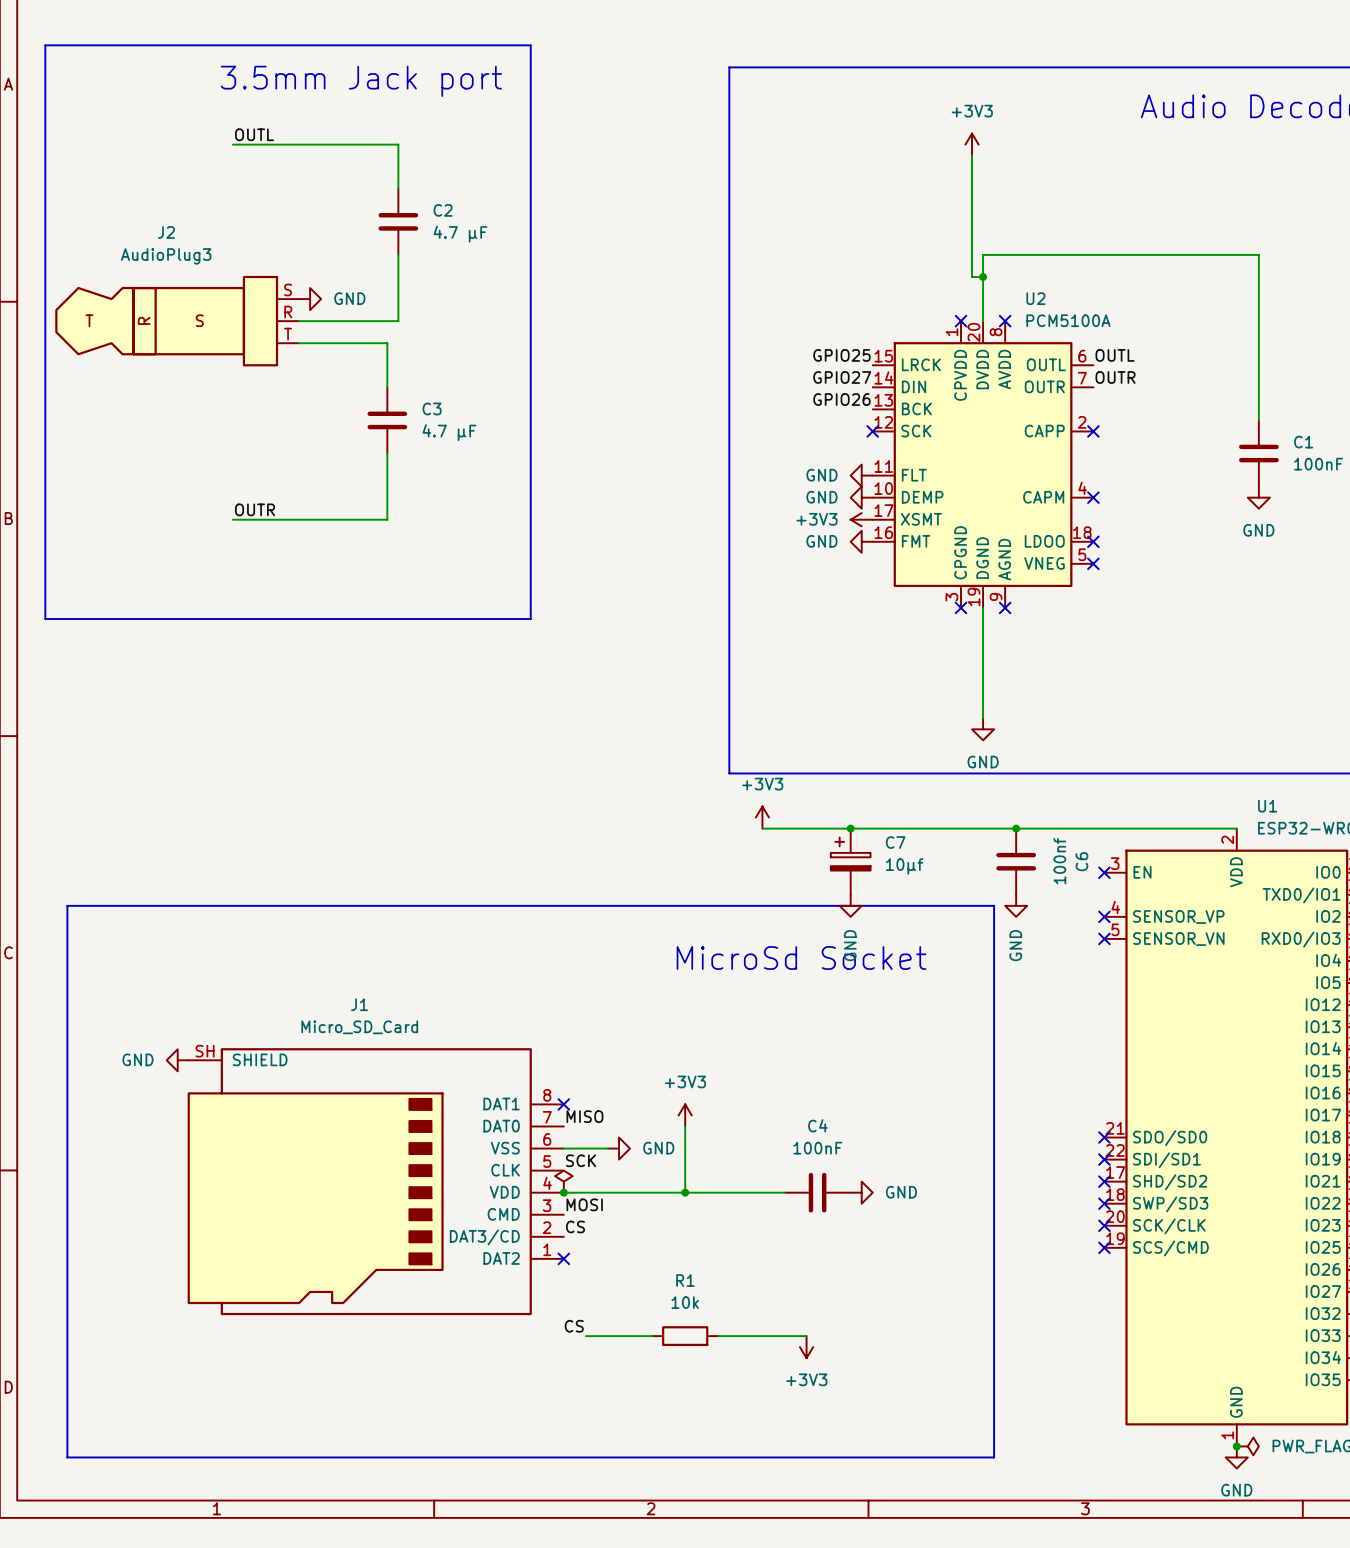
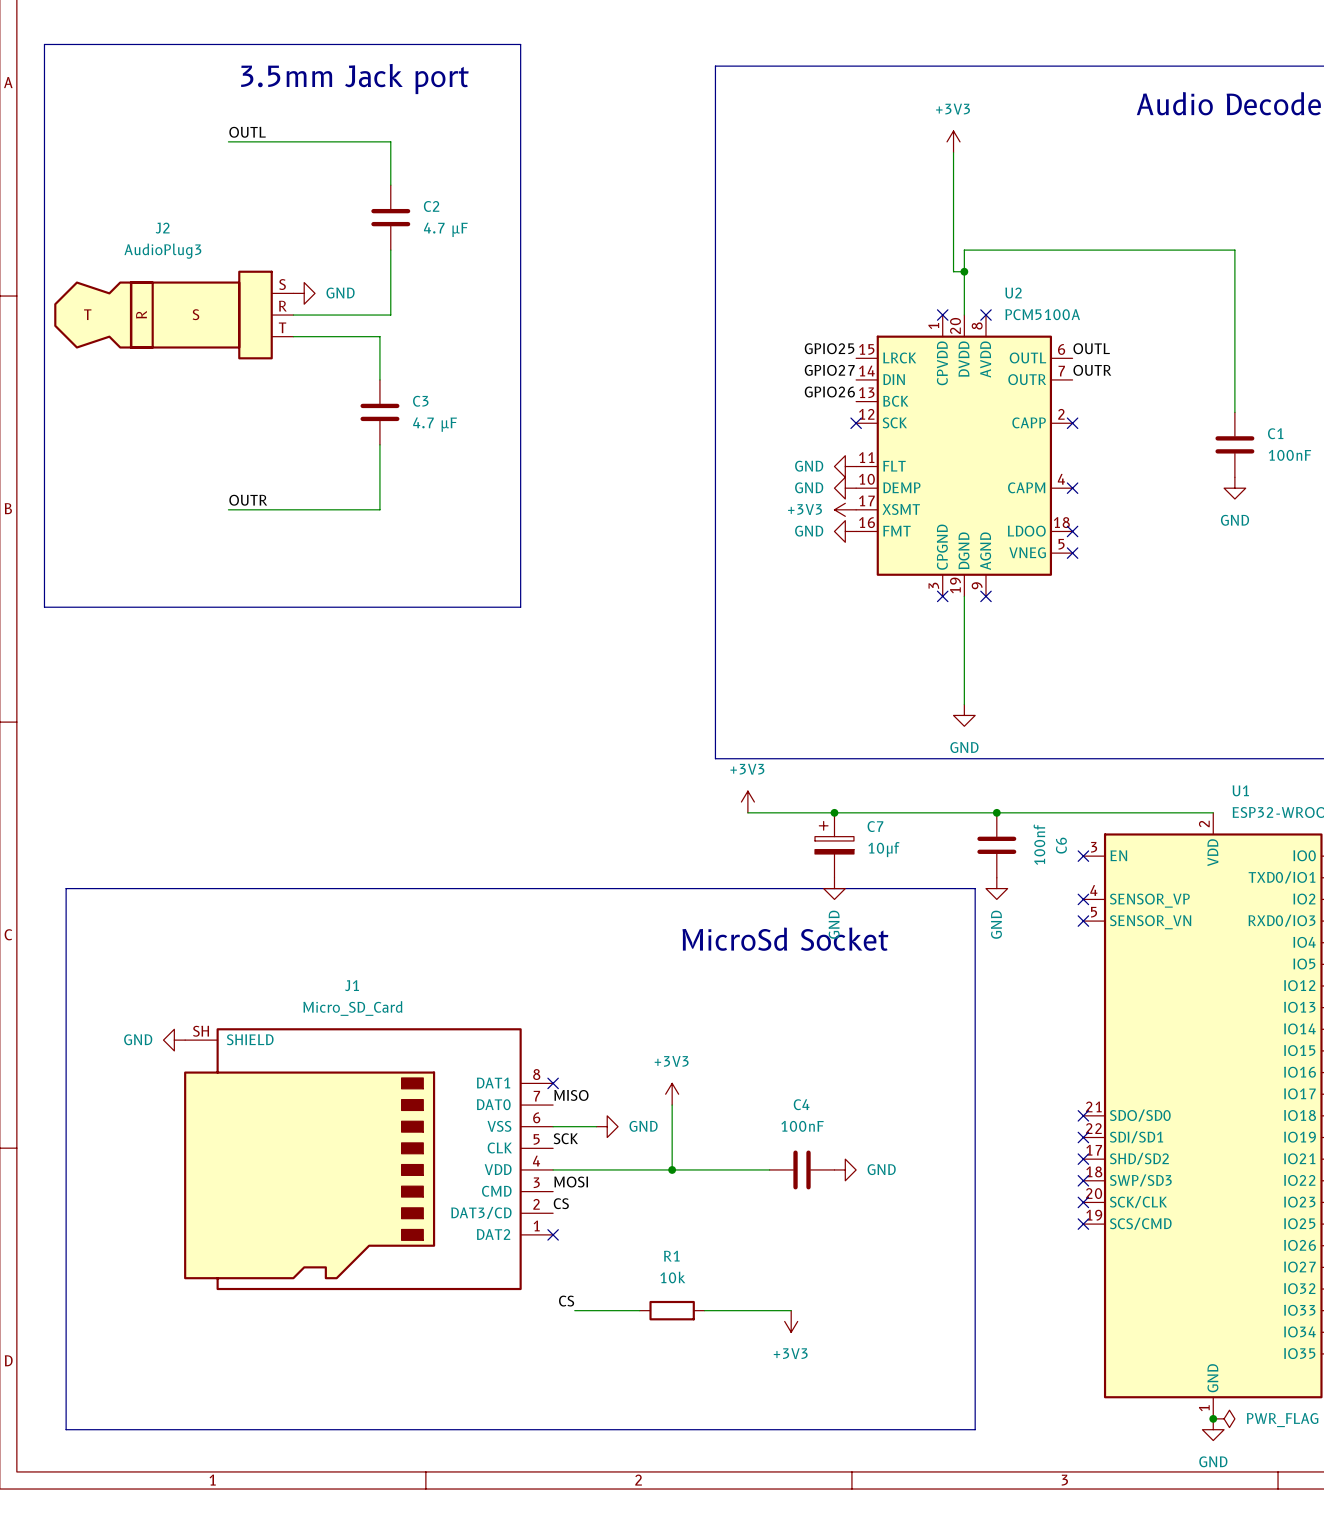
power symbol: (563, 1181) -> none
junction: (563, 1192) -> none

